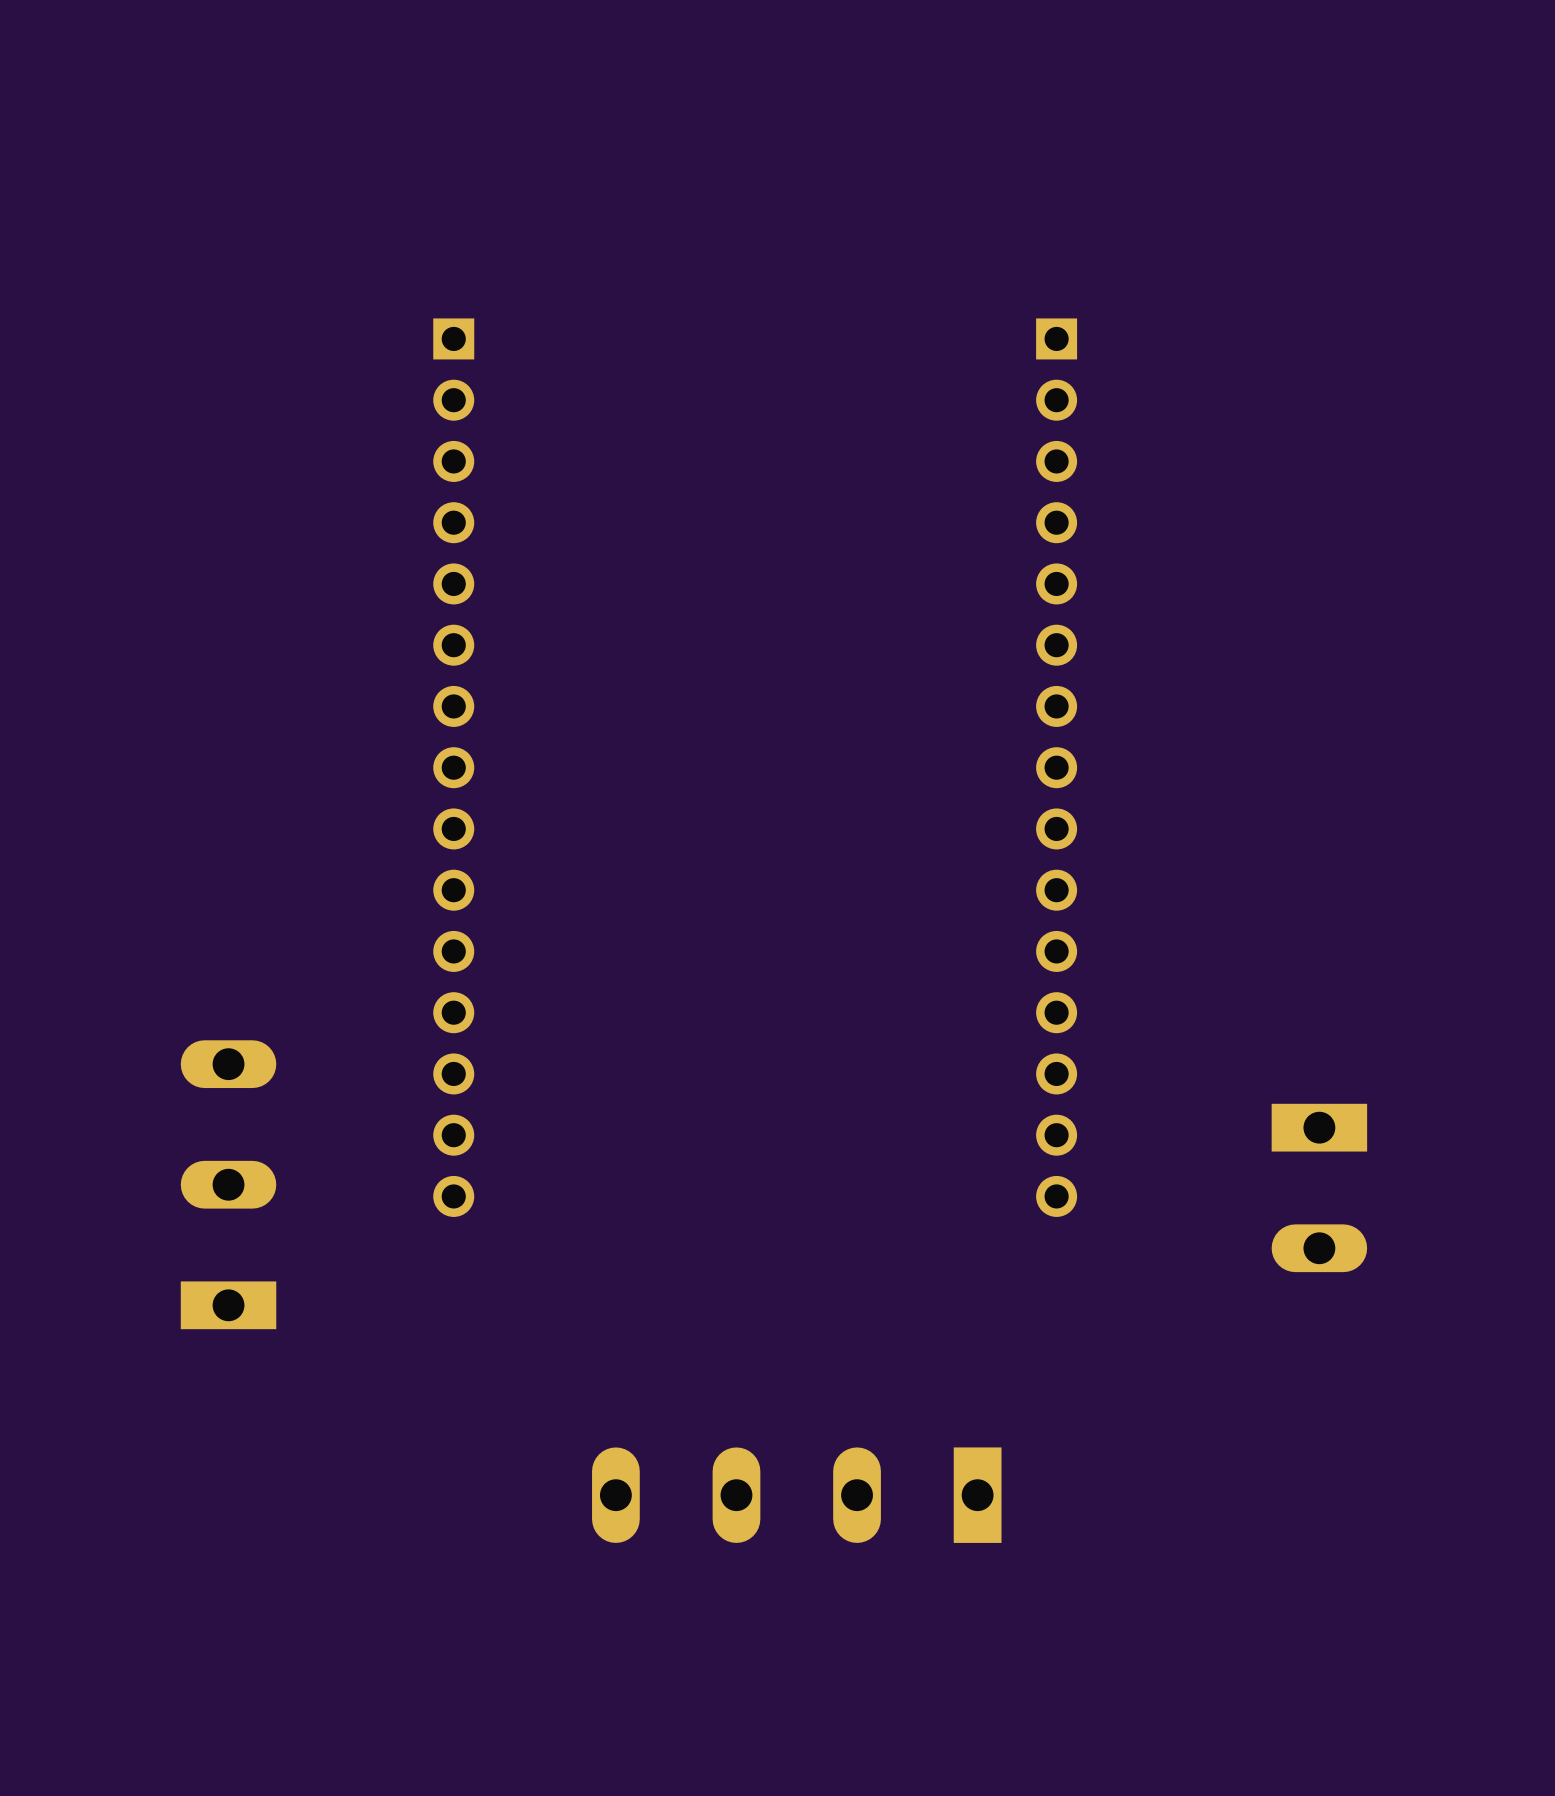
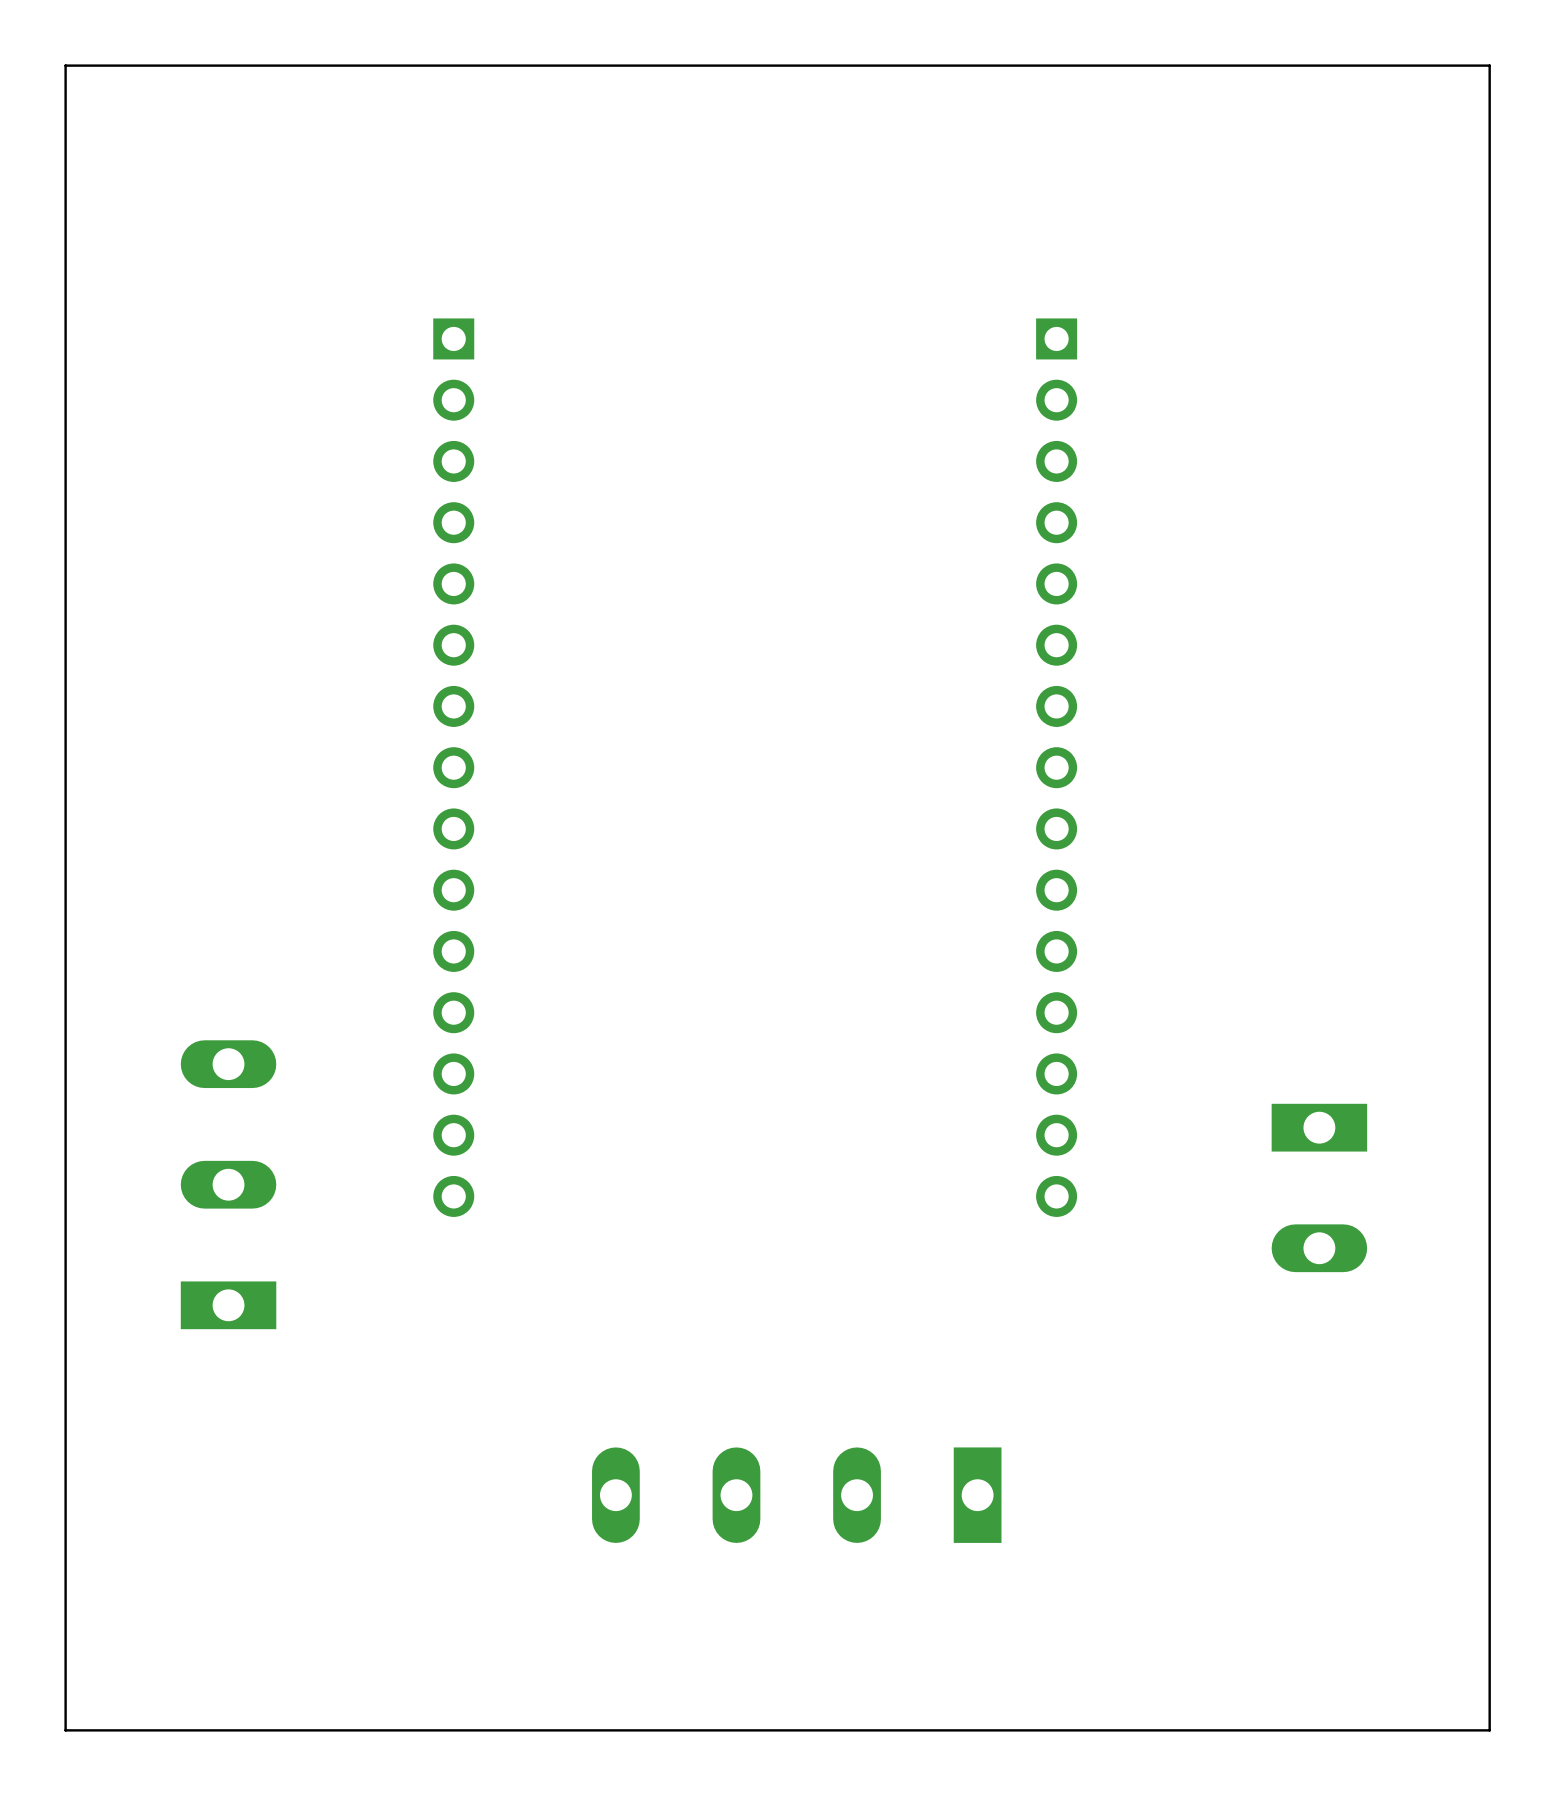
board edge: none -> (1489, 65) (65, 65) (65, 1730) (1489, 1730) (1489, 65)

